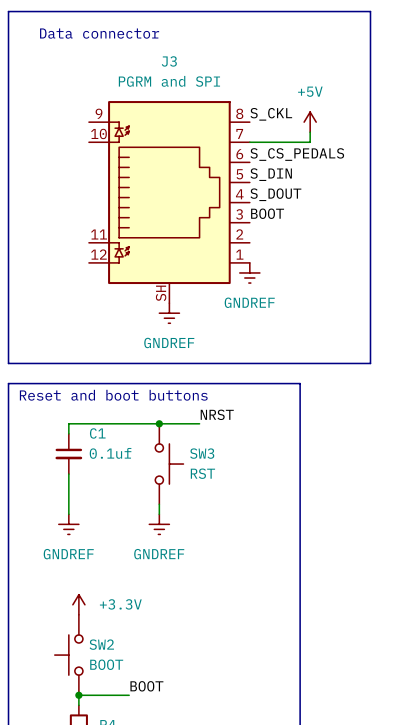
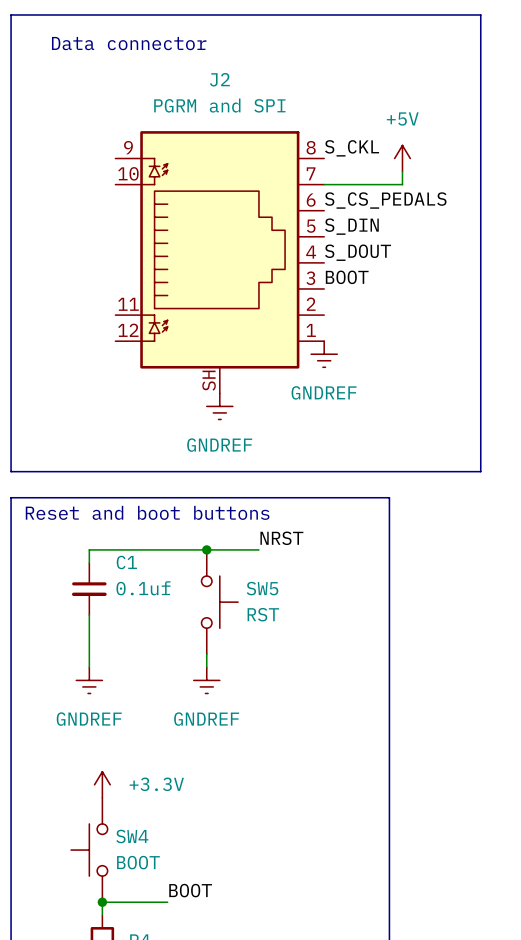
J3 name: J3 (169, 61) -> J2 (219, 79)
SW3 name: SW3 (202, 453) -> SW5 (262, 588)
SW2 name: SW2 (101, 644) -> SW4 (132, 836)

